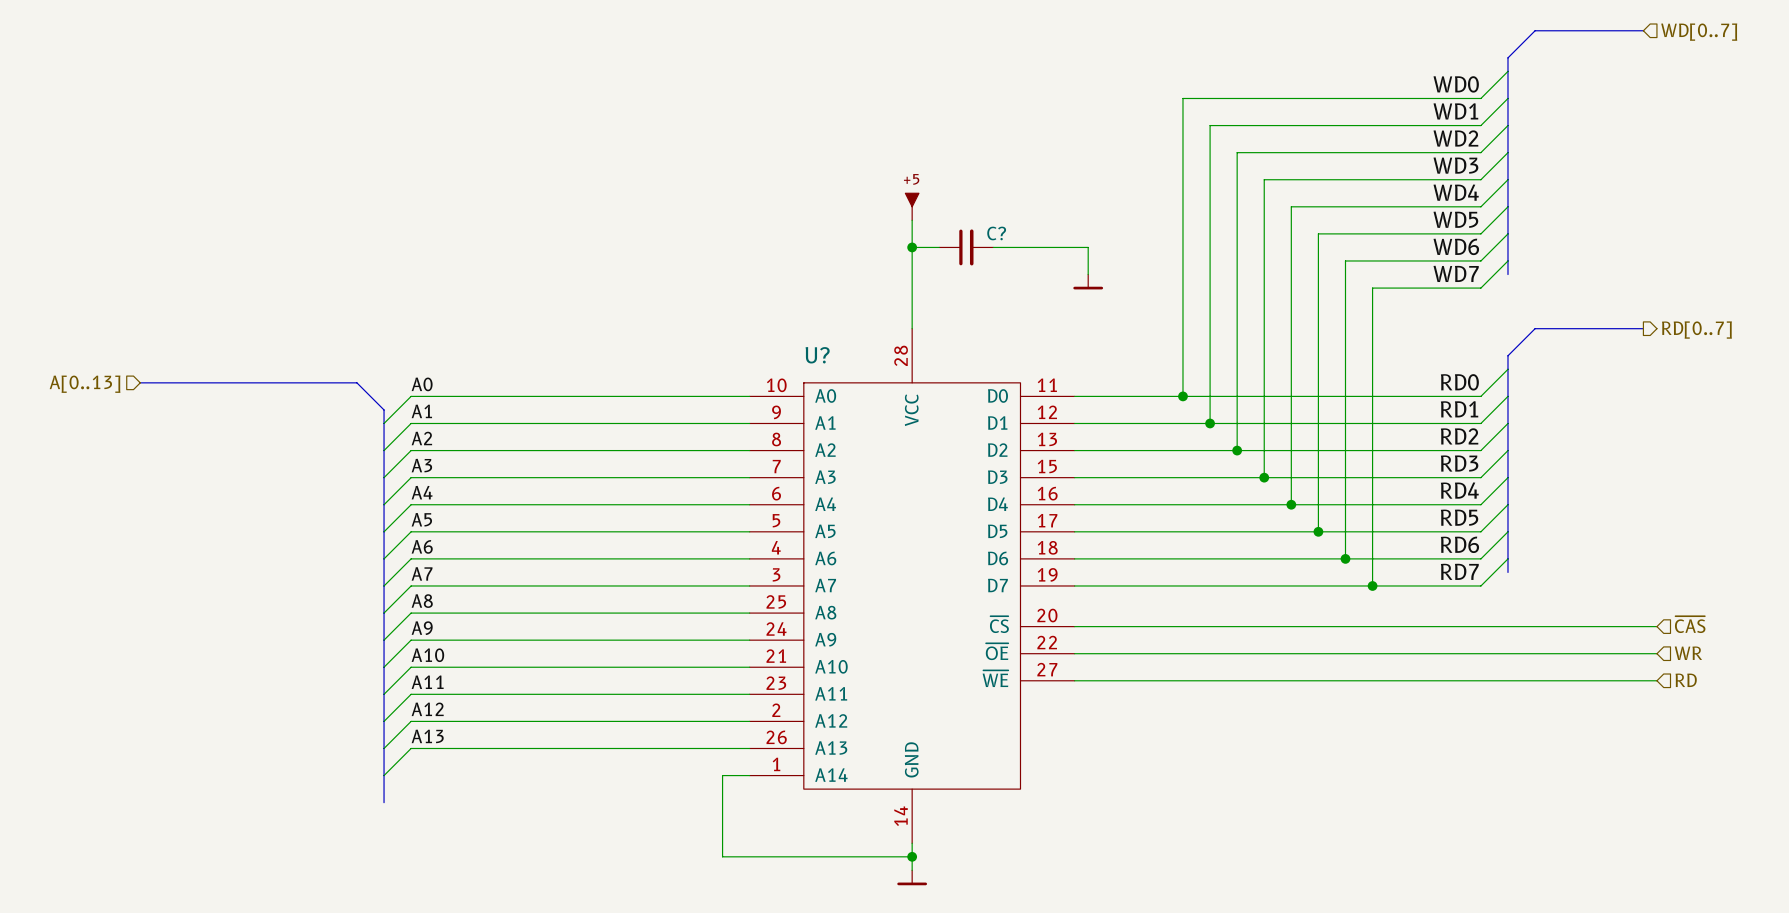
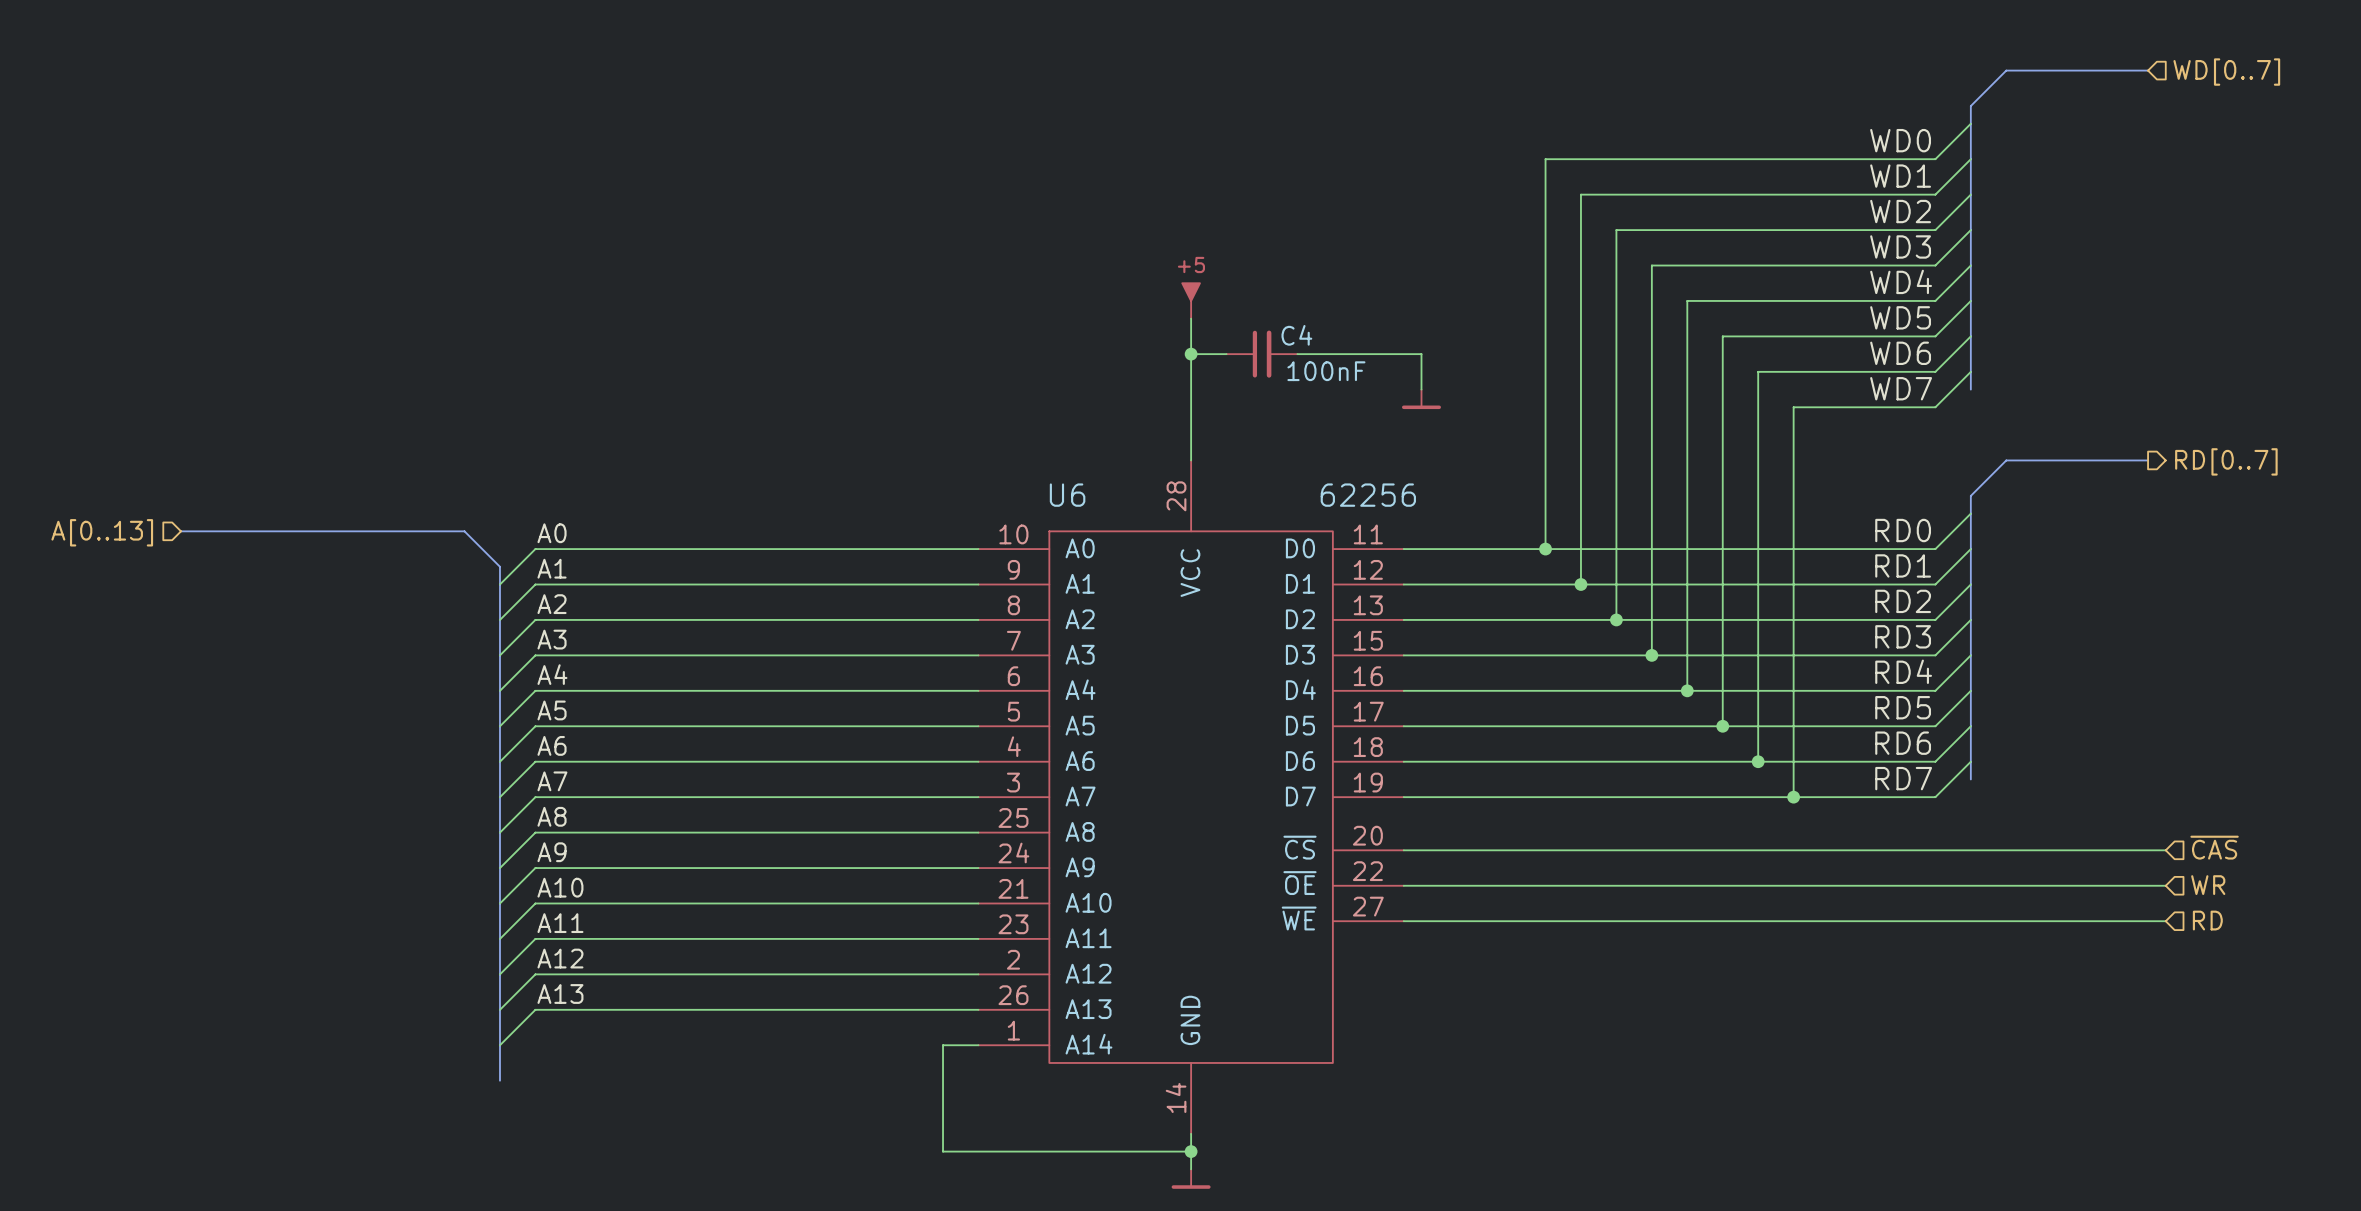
C? name: C? (996, 233) -> C4 (1296, 335)
C? value: none -> 100nF (1326, 371)
U? name: U? (817, 355) -> U6 (1067, 495)
U? value: none -> 62256 (1368, 495)

